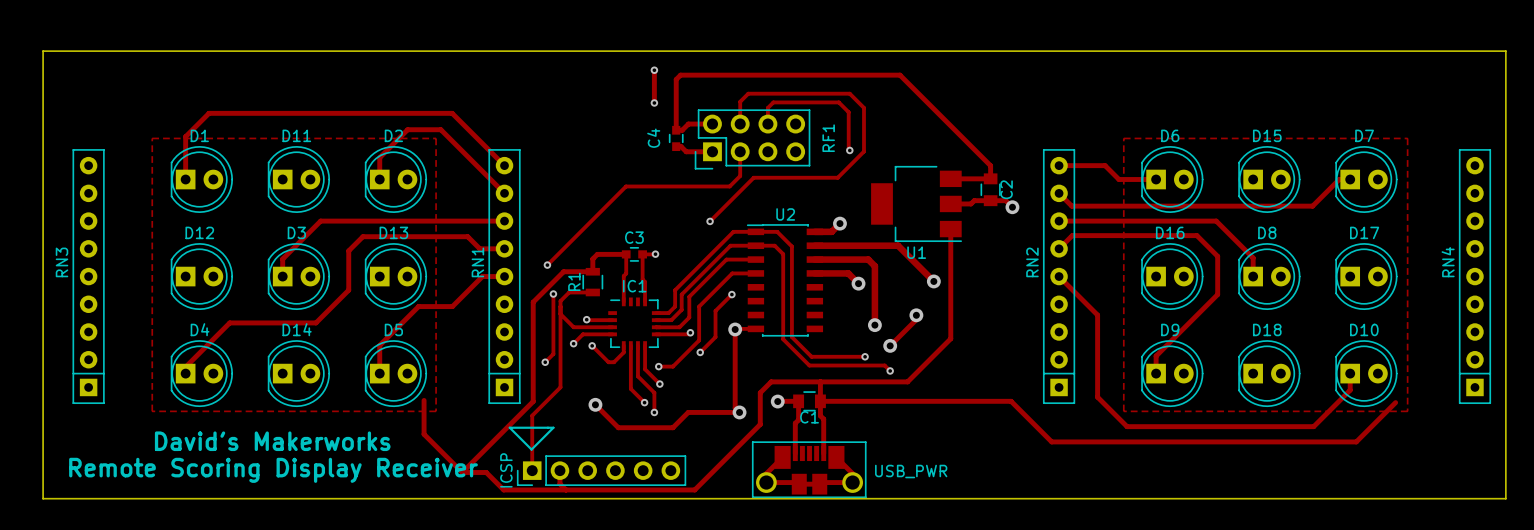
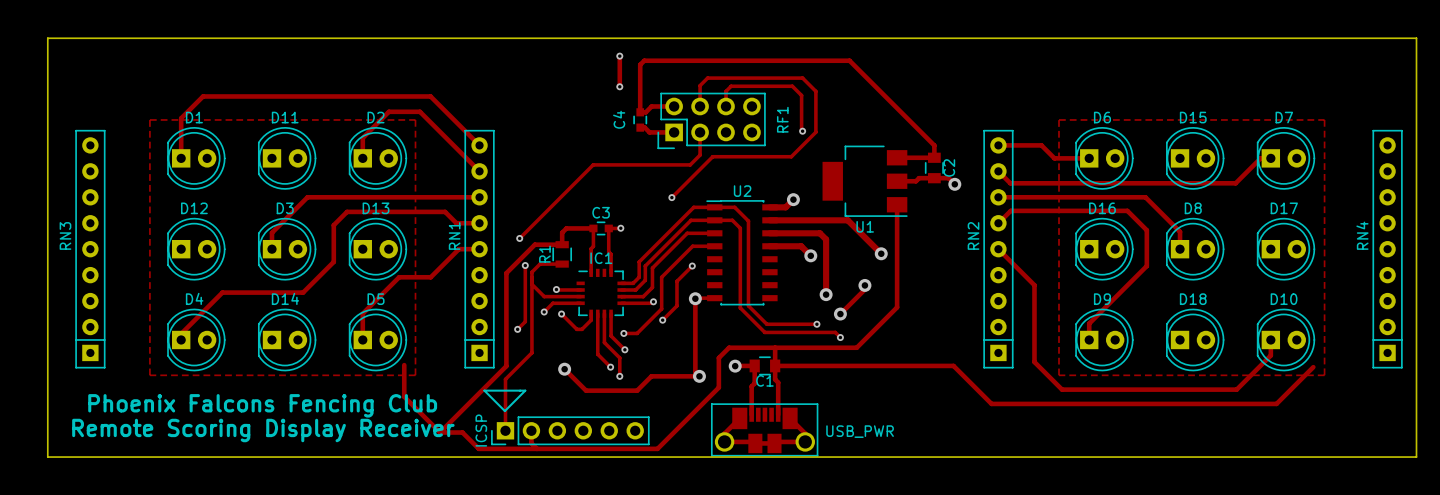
text: David's Makerworks (272, 441) -> Phoenix Falcons Fencing Club (262, 405)

